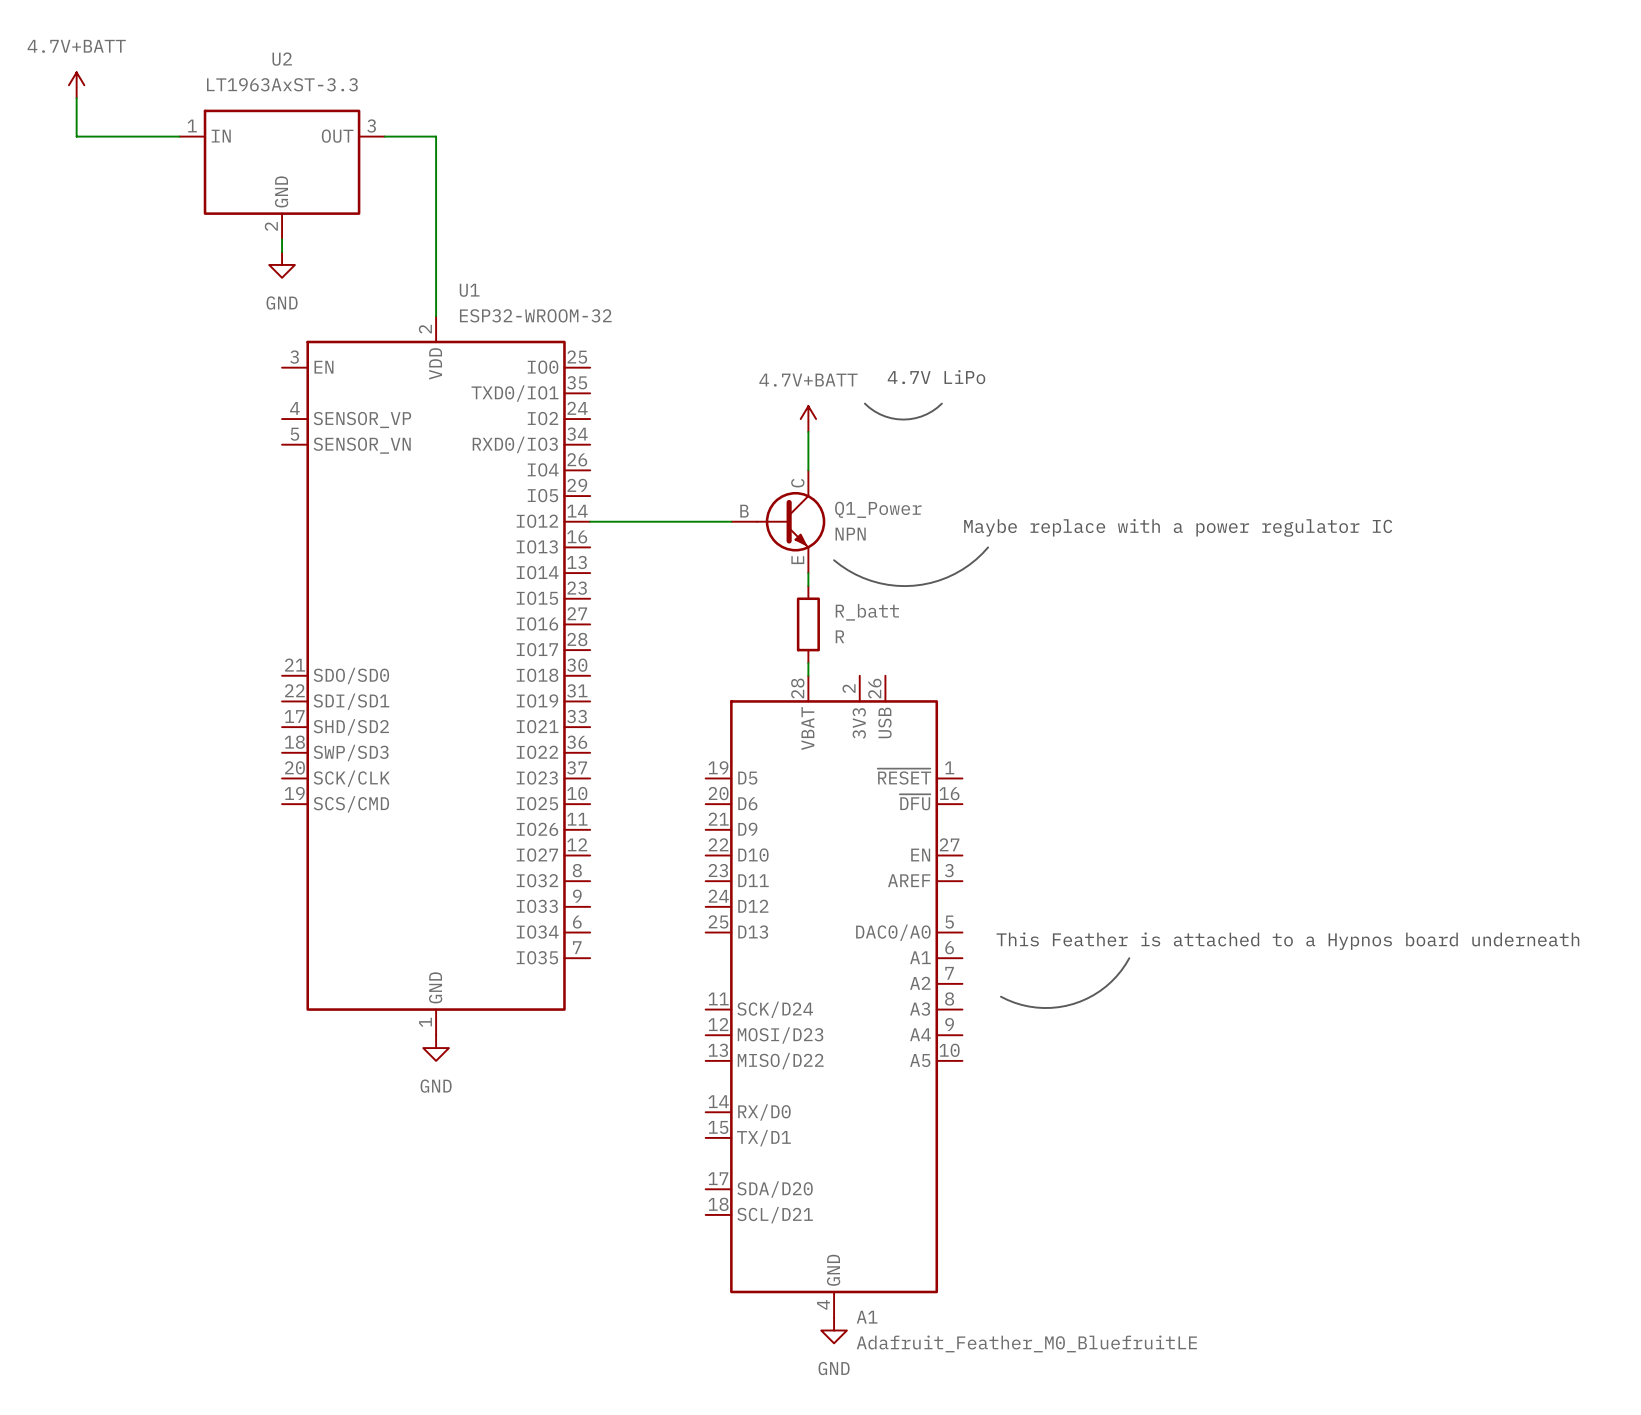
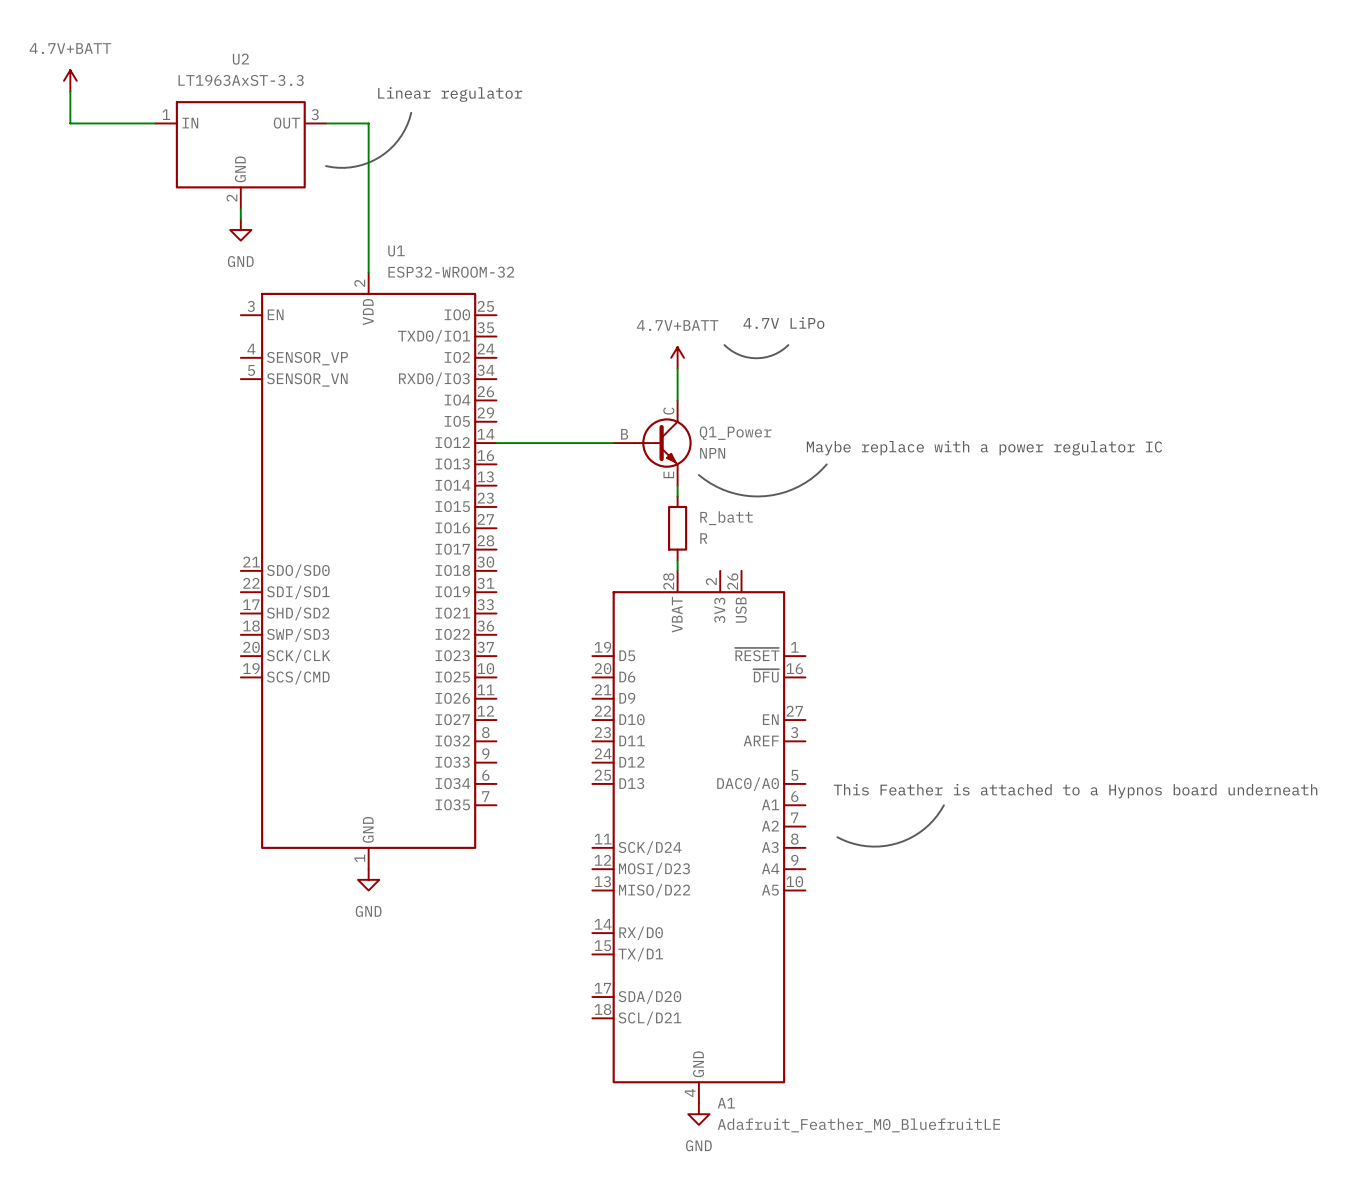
text: none -> Linear regulator (450, 94)
line: none -> (411, 112) (401, 135) (389, 149) (379, 157) (356, 166) (344, 167) (326, 166)

